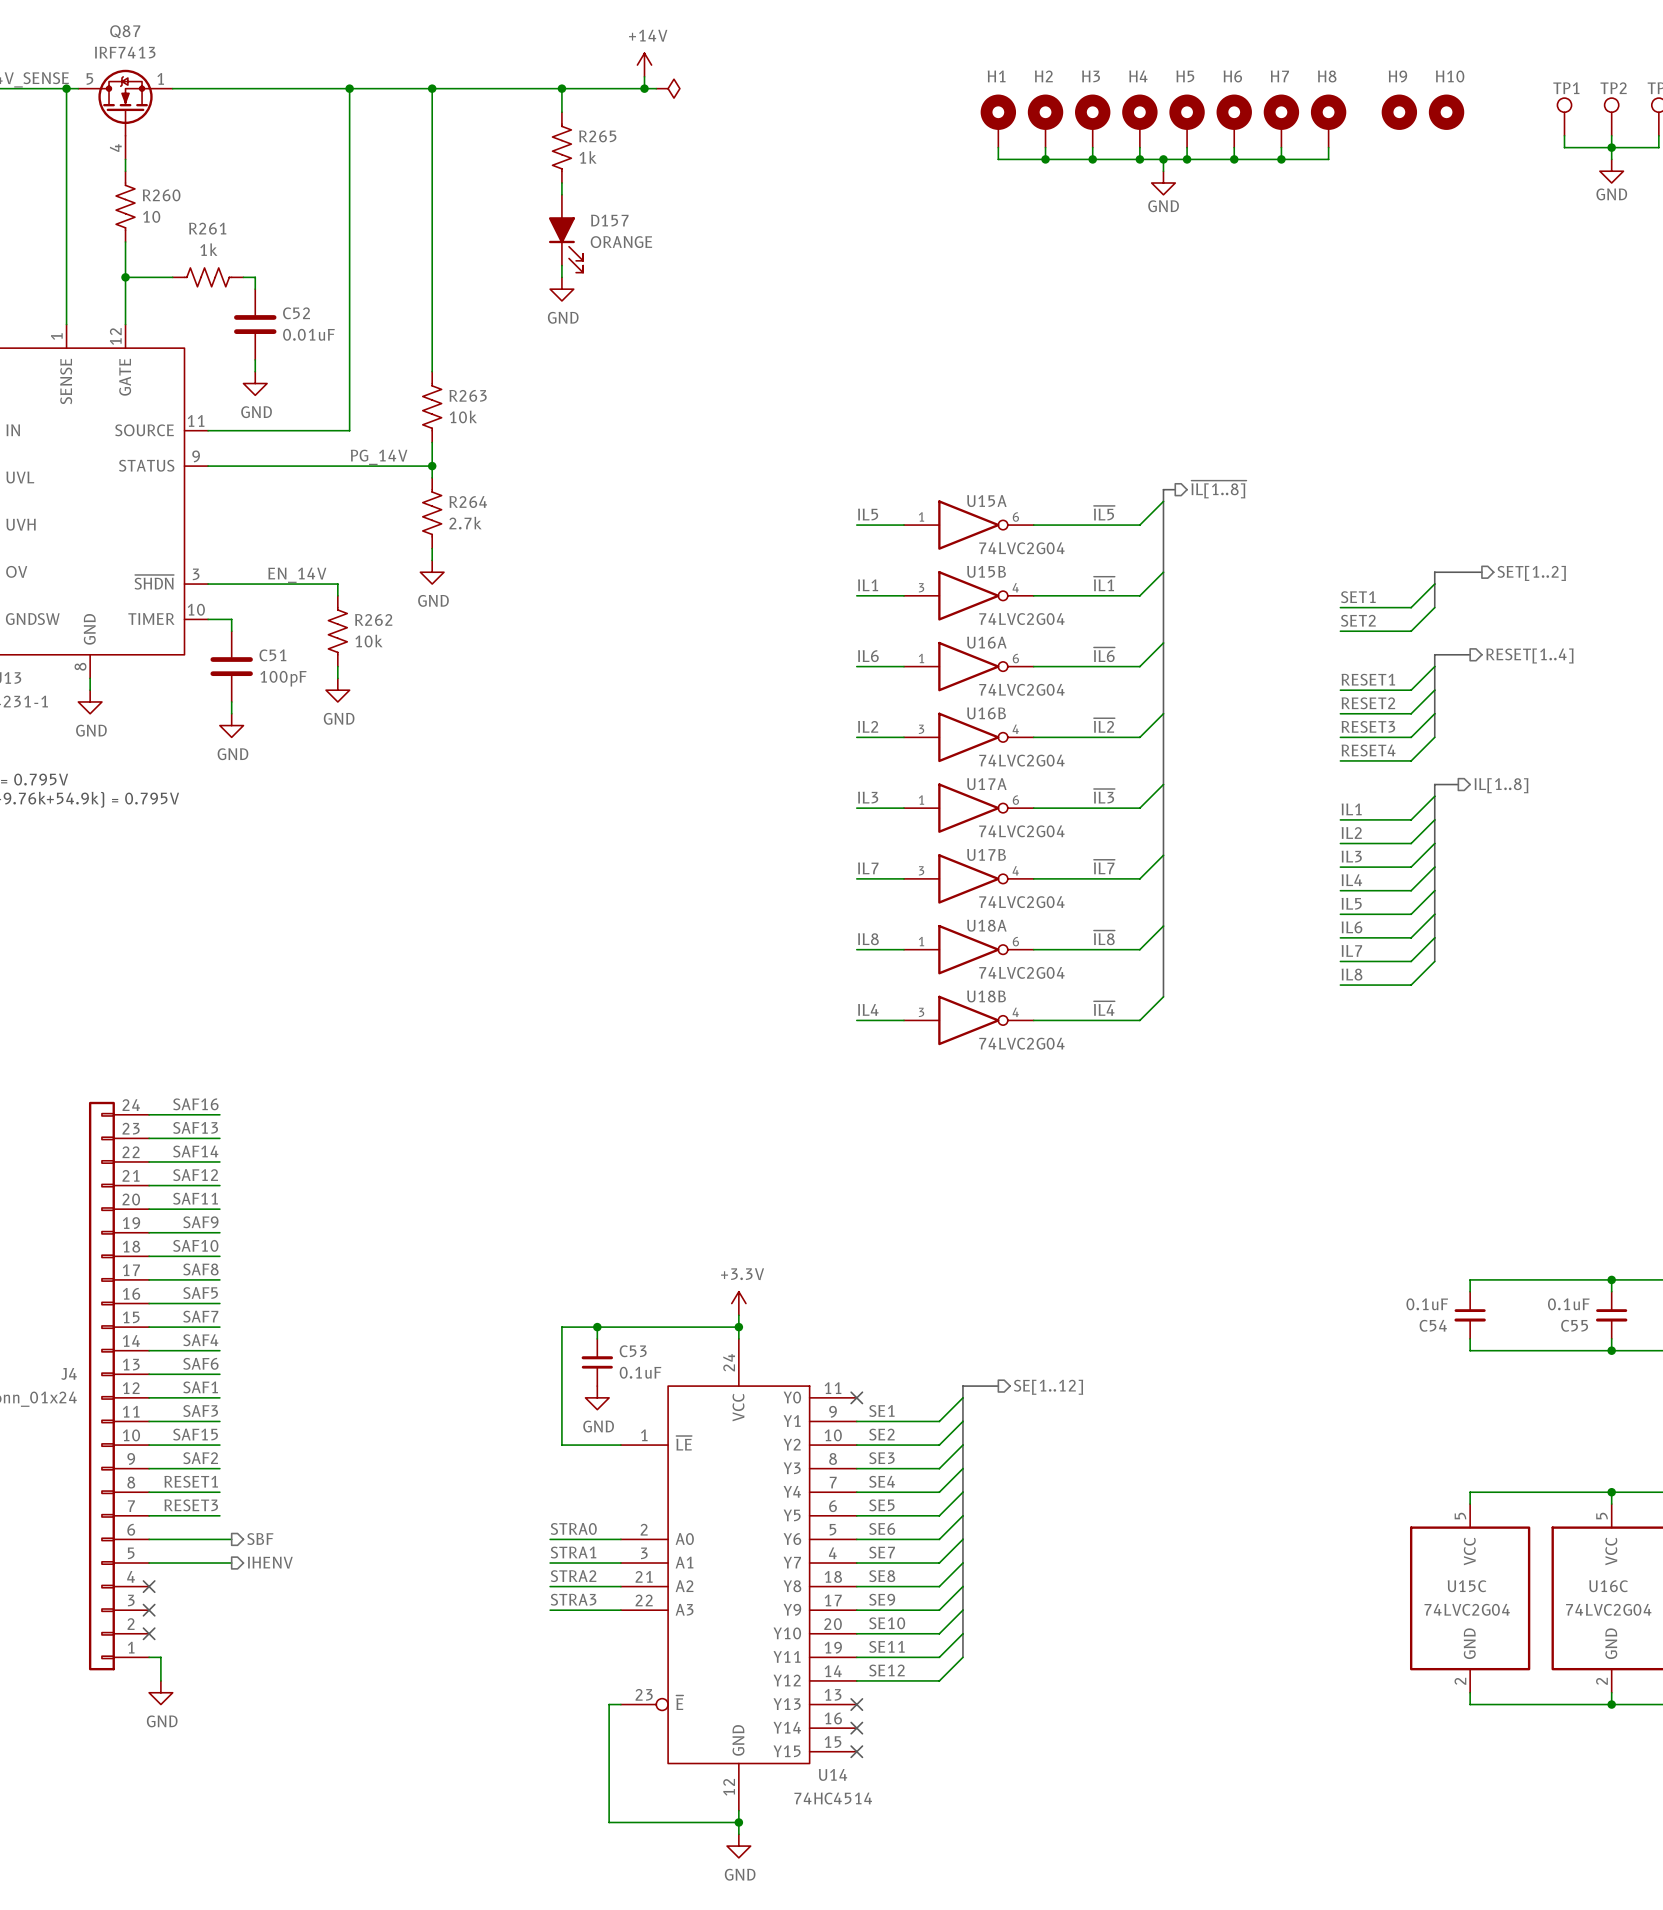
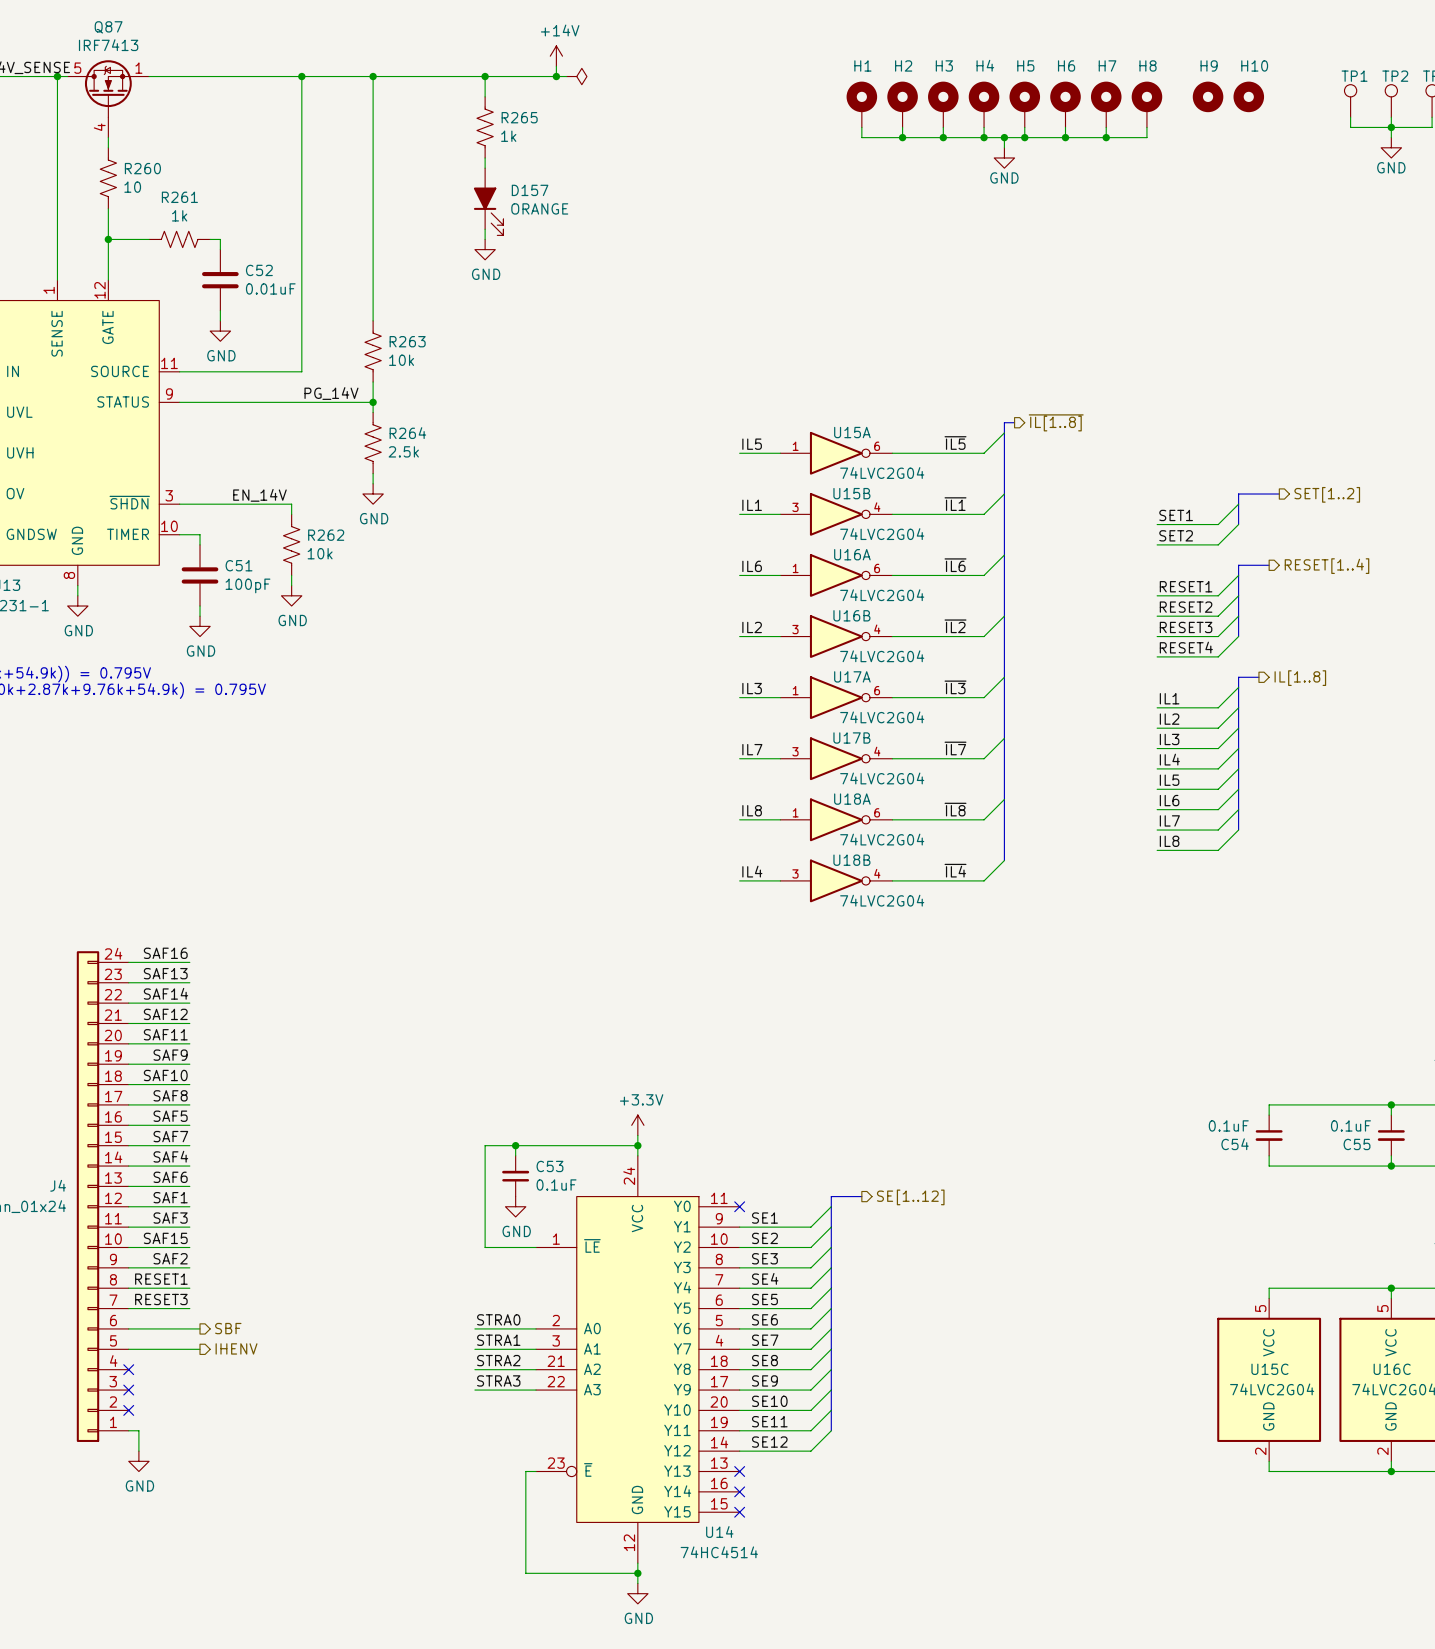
R264 value: 2.7k (465, 523) -> 2.5k (403, 451)

